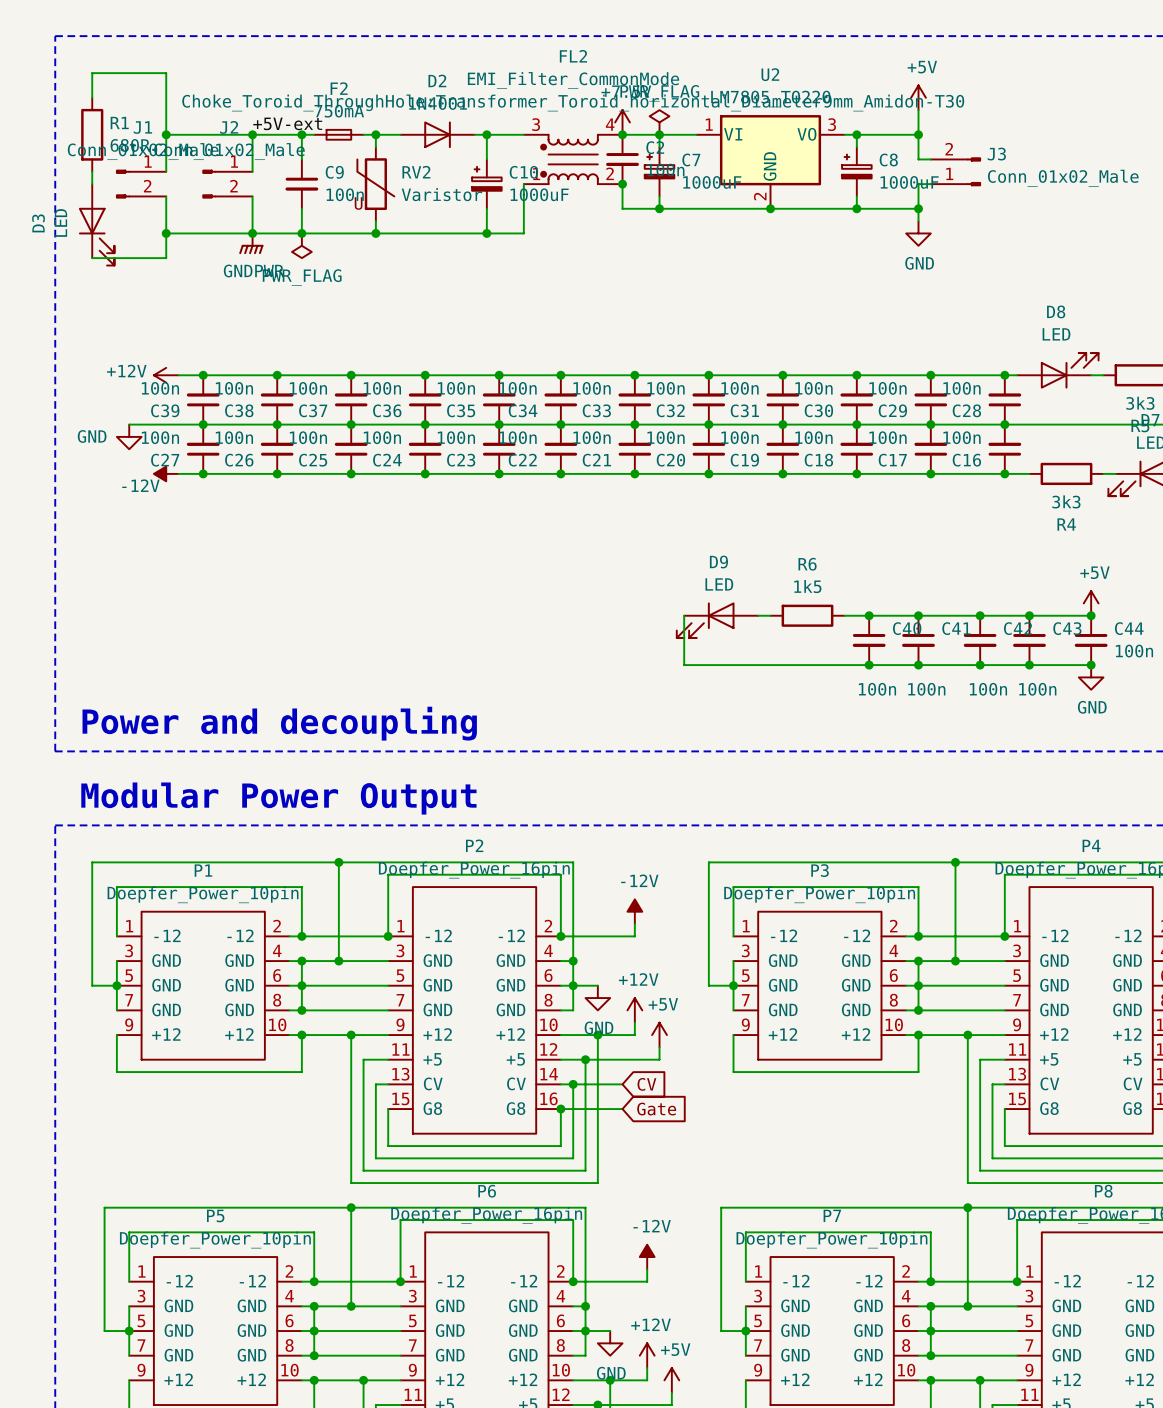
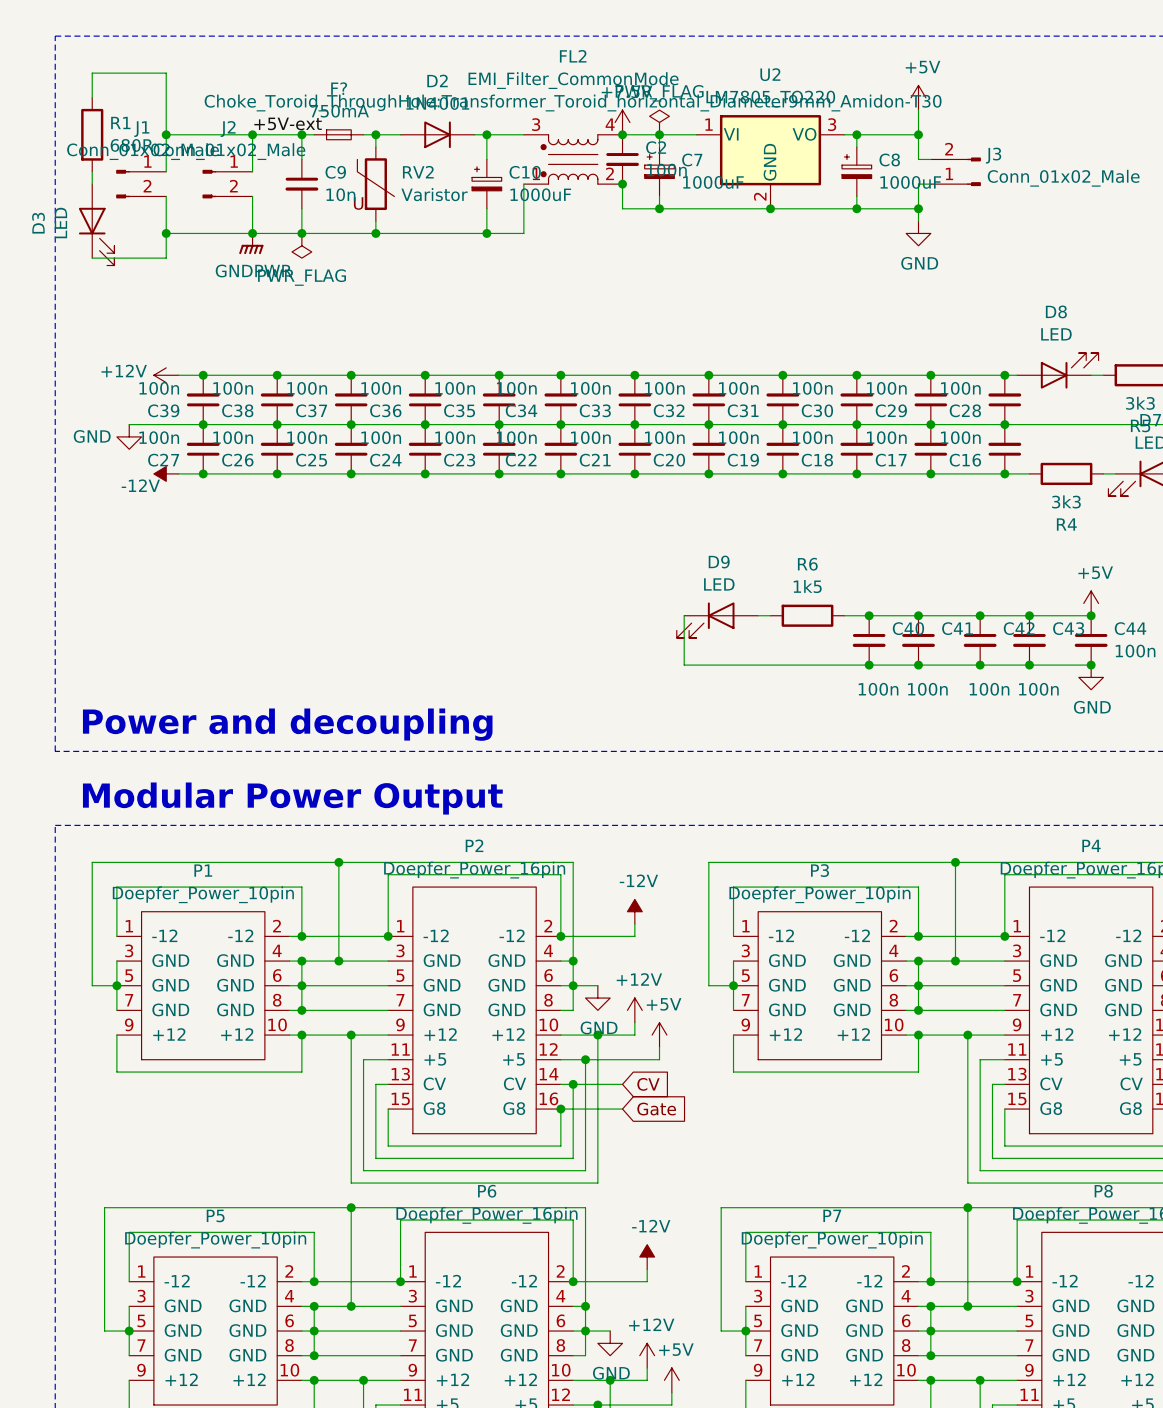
F2 name: F2 (339, 88) -> F? (339, 88)
C9 value: 100n (345, 194) -> 10n (340, 194)

